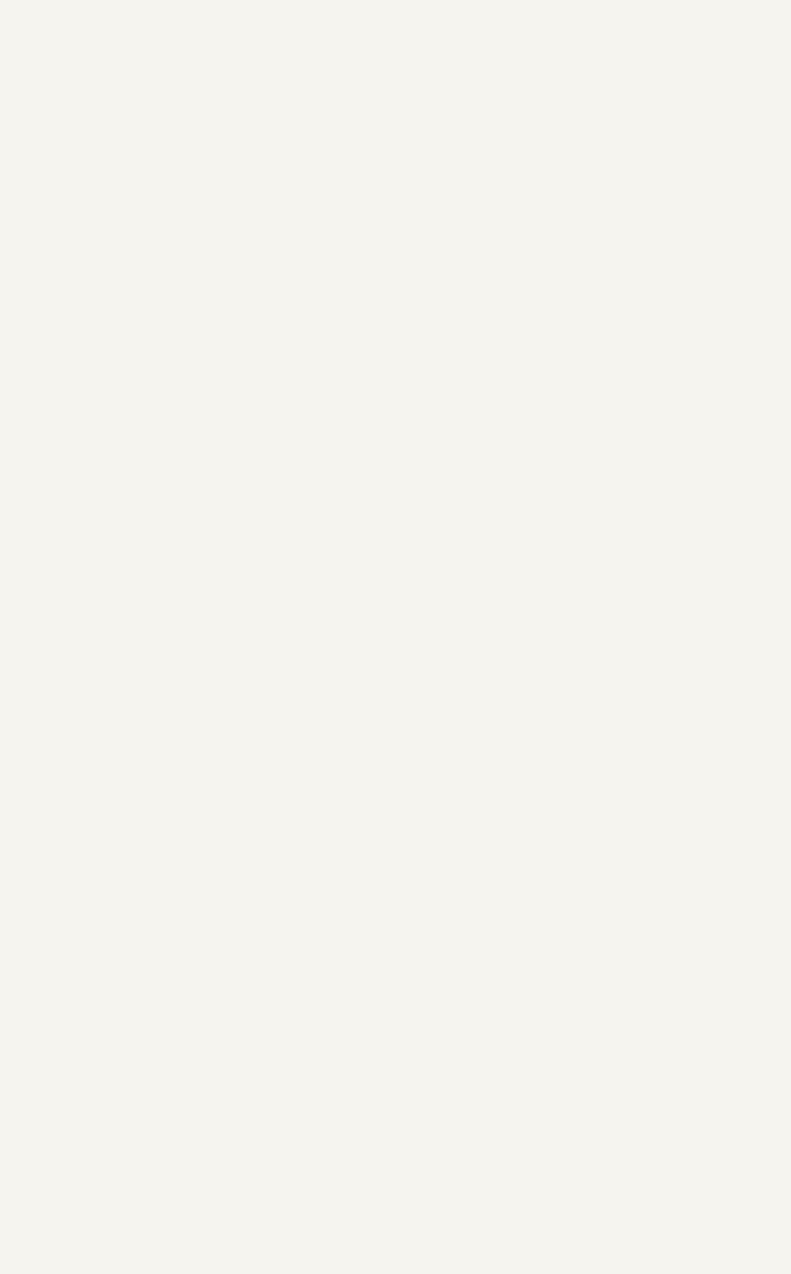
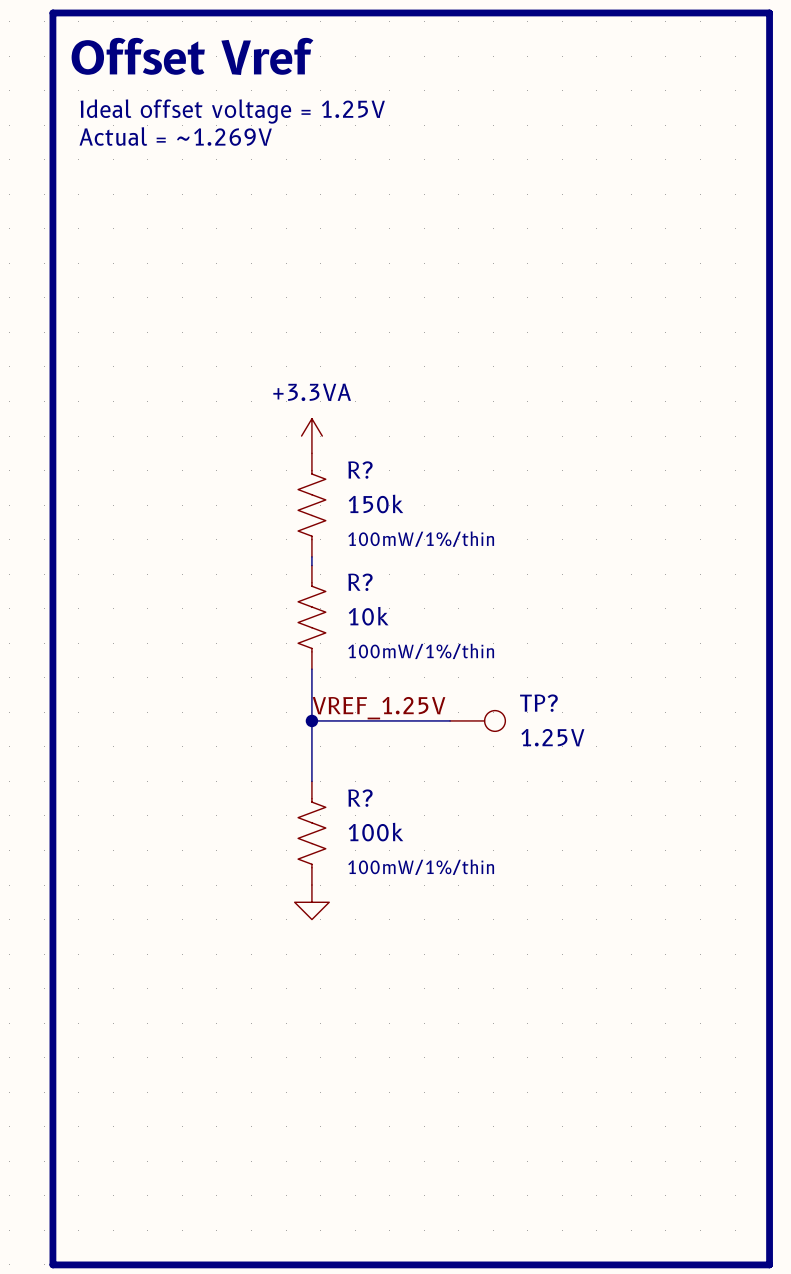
line: none -> (52, 12) (769, 12) (769, 1264) (52, 1264) (52, 12)
text: none -> Offset Vref (192, 56)
text: none -> Ideal offset voltage = 1.25V (232, 111)
text: none -> Actual = ~1.269V (175, 136)
power symbol: none -> +3.3VA (311, 436)
R?: none -> 150k (311, 505)
wire: none -> (311, 556) (311, 565)
R?: none -> 10k (311, 617)
wire: none -> (311, 669) (311, 781)
label: none -> VREF_1.25V (379, 708)
wire: none -> (311, 720) (450, 720)
junction: none -> (311, 720)
TP?: none -> 1.25V (477, 720)
R?: none -> 100k (311, 833)
power symbol: none -> (311, 902)

